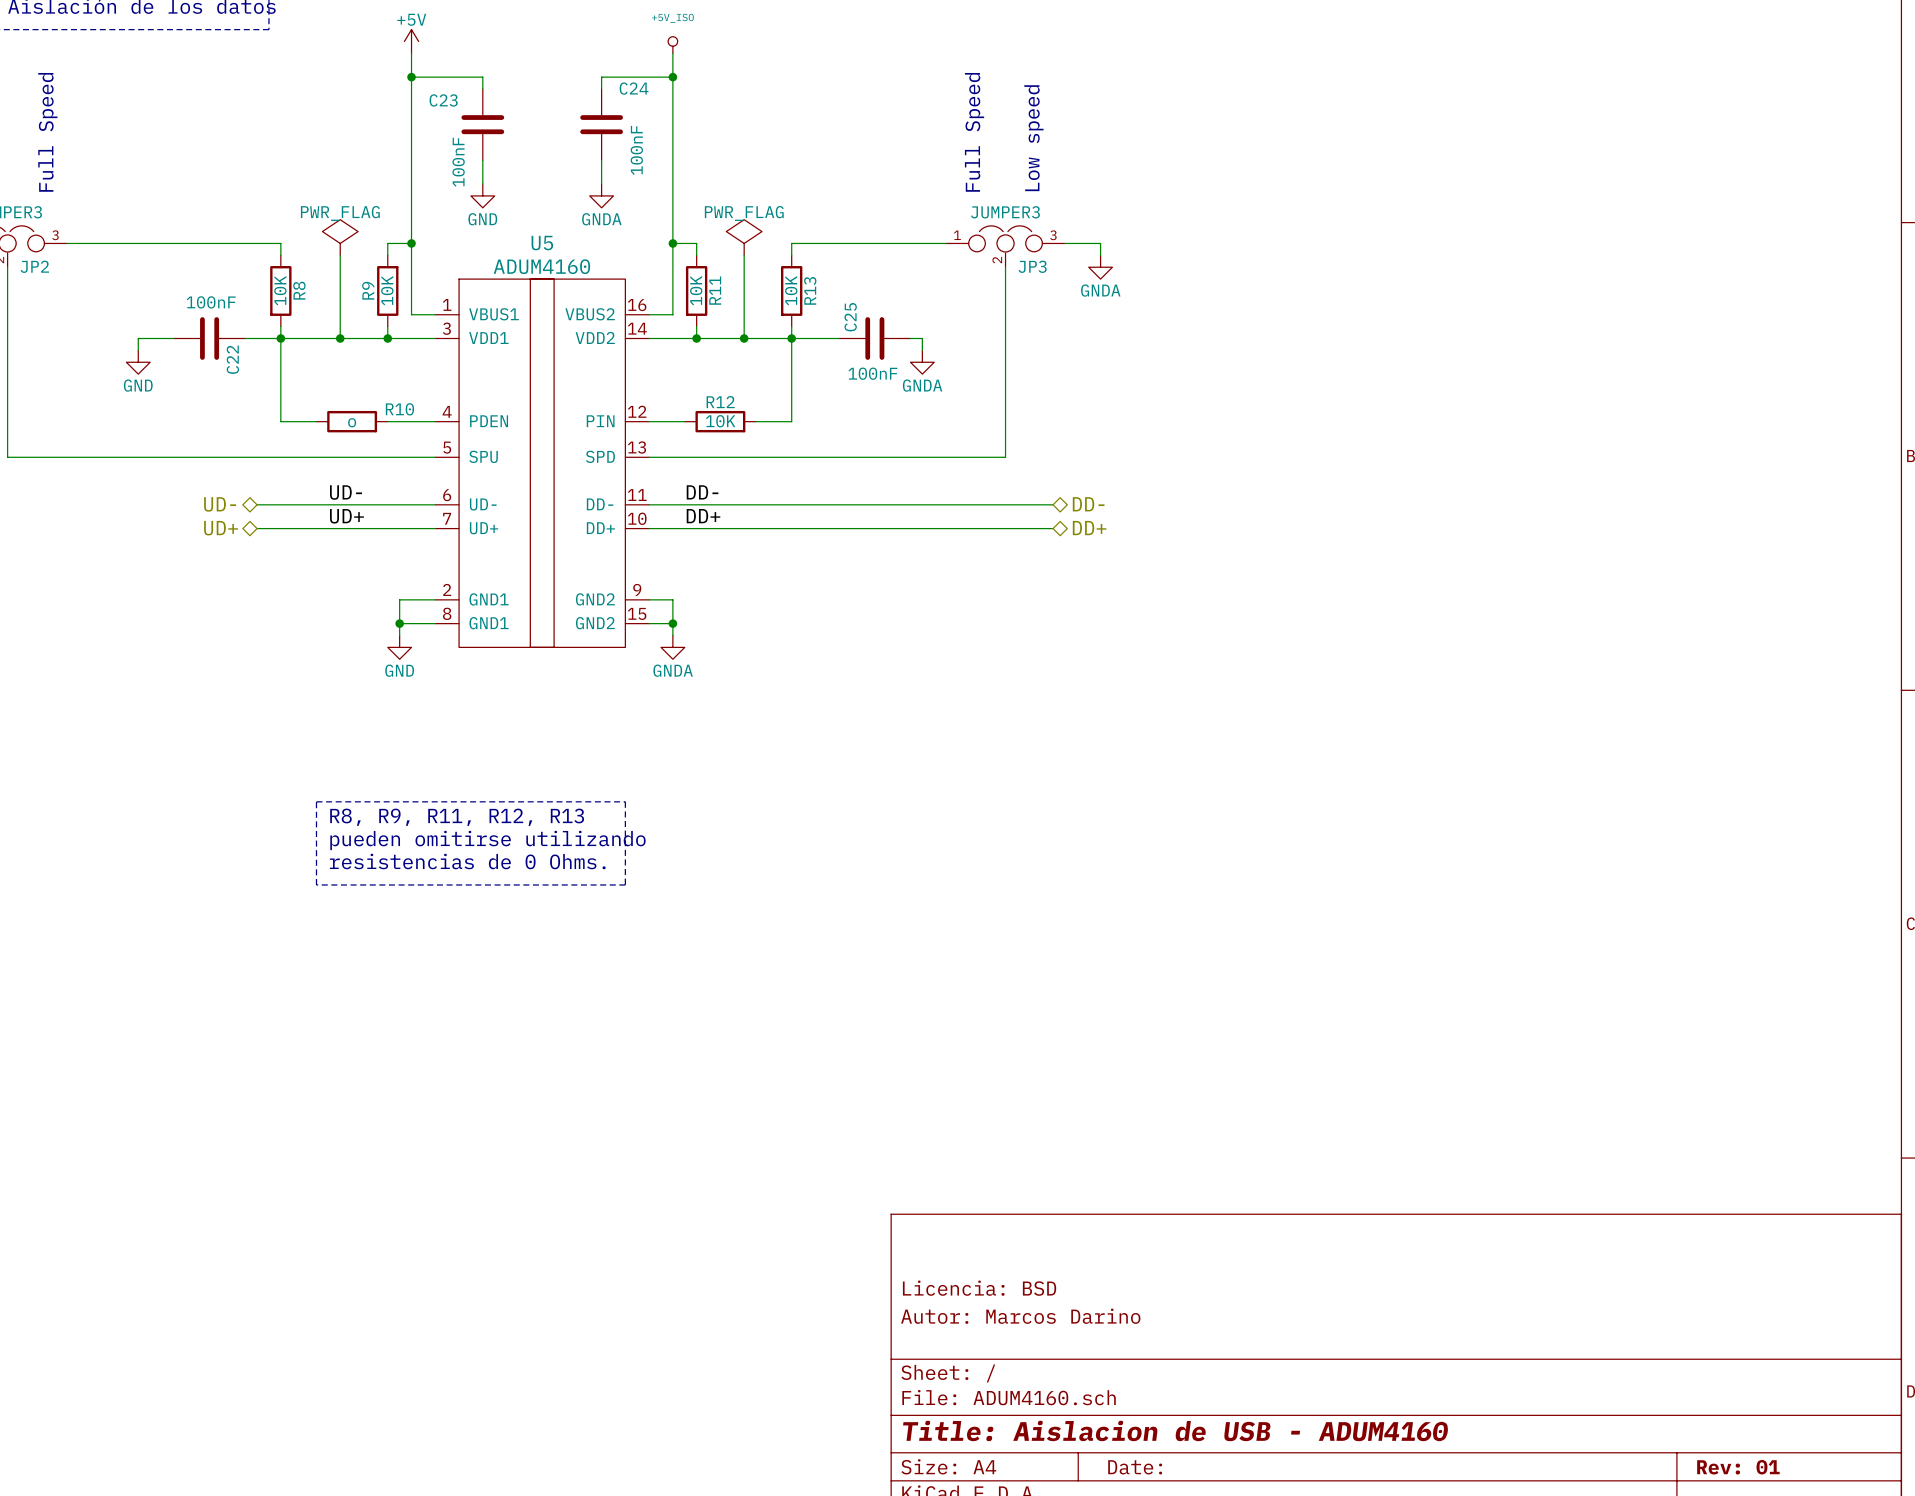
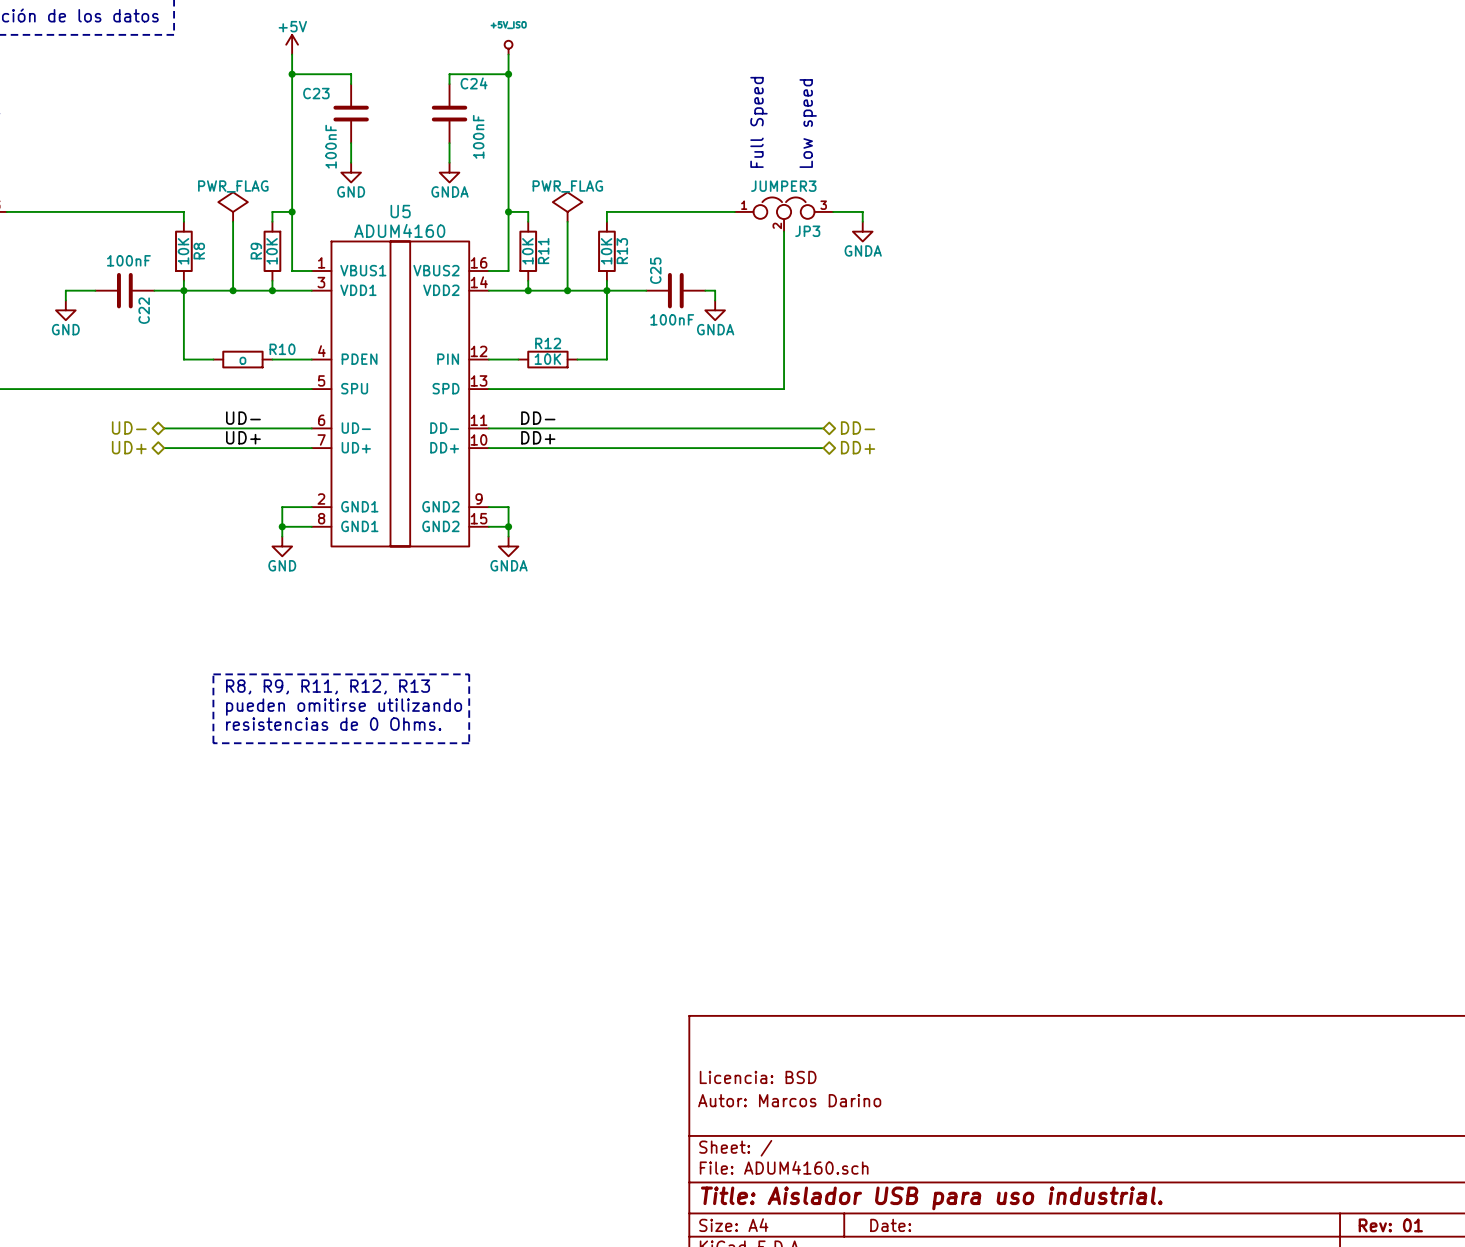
title block: Title: Aislacion de USB - ADUM4160 (1175, 1430) -> Title: Aislador USB para uso industrial. (931, 1198)

